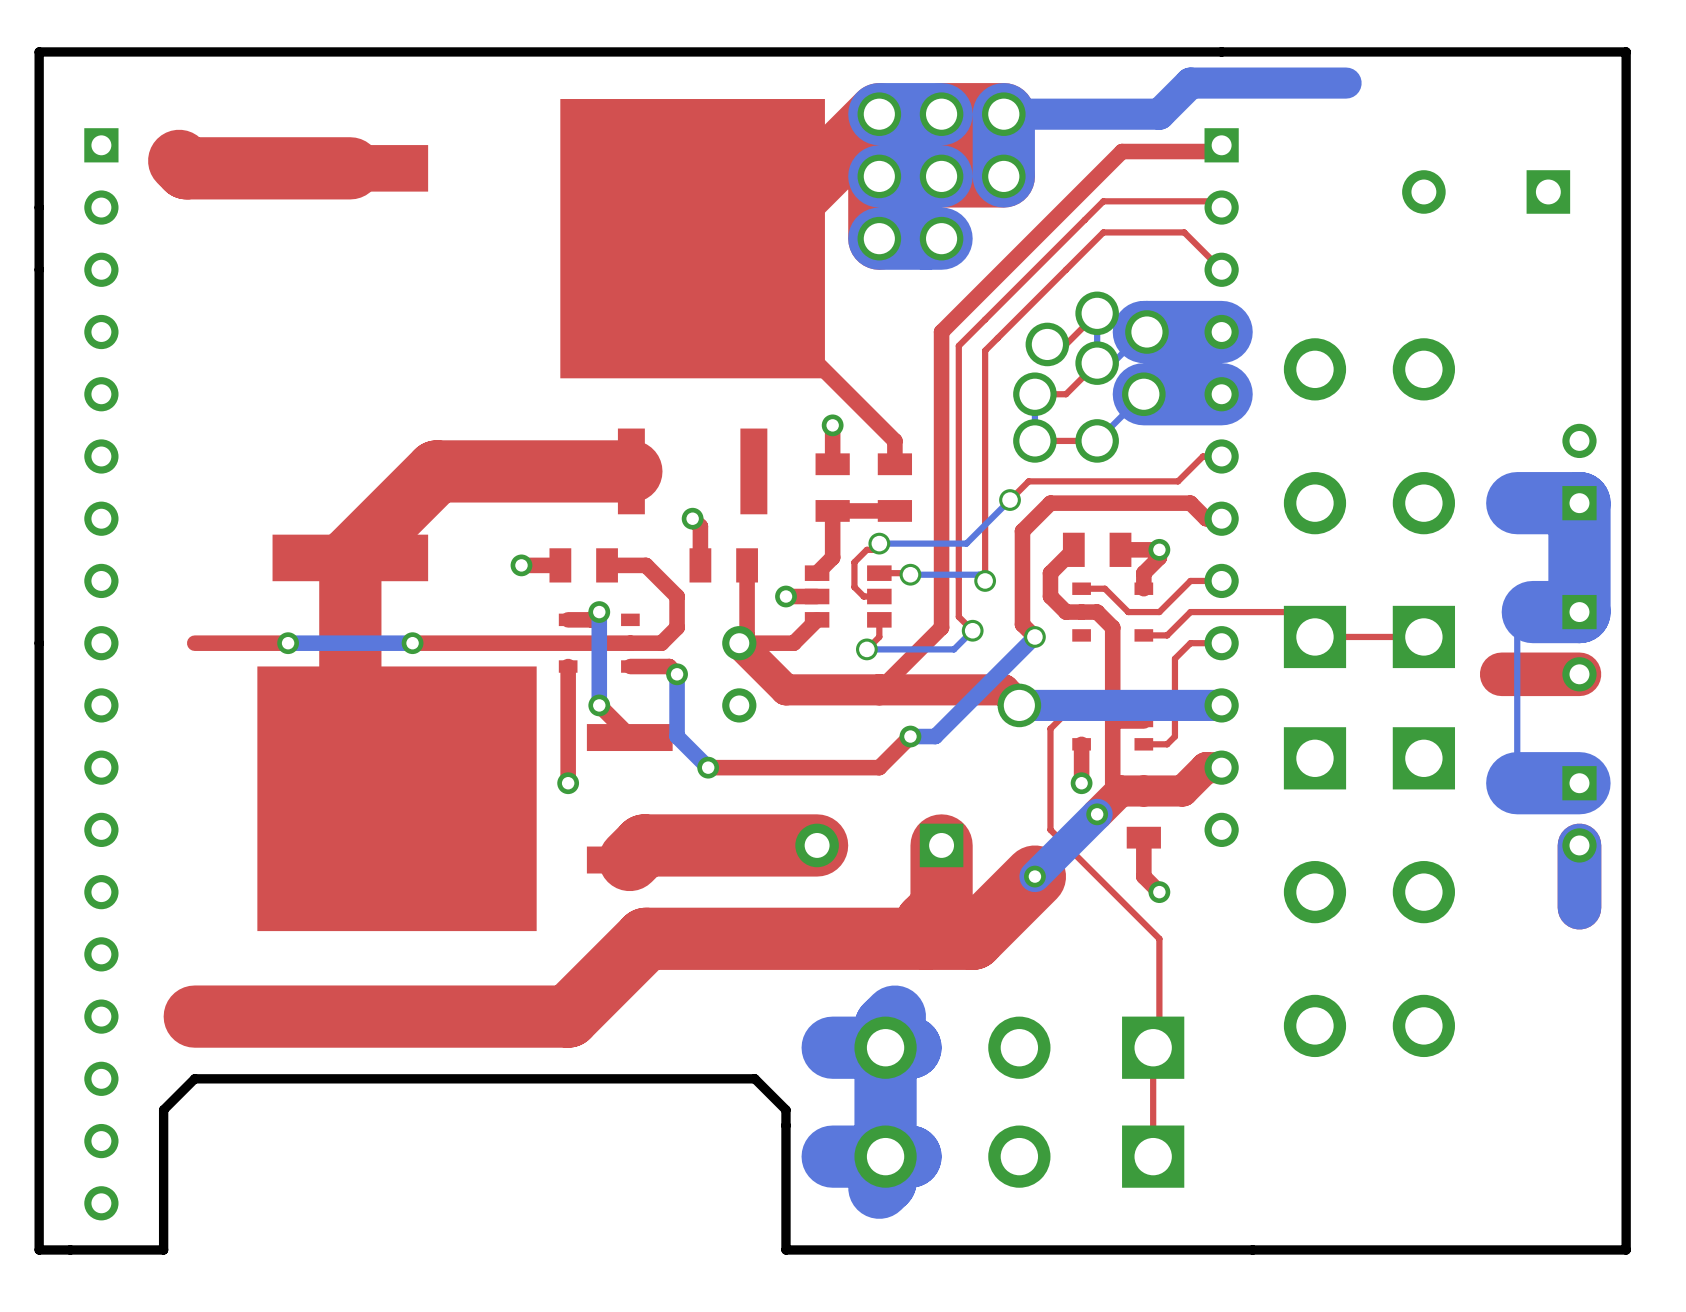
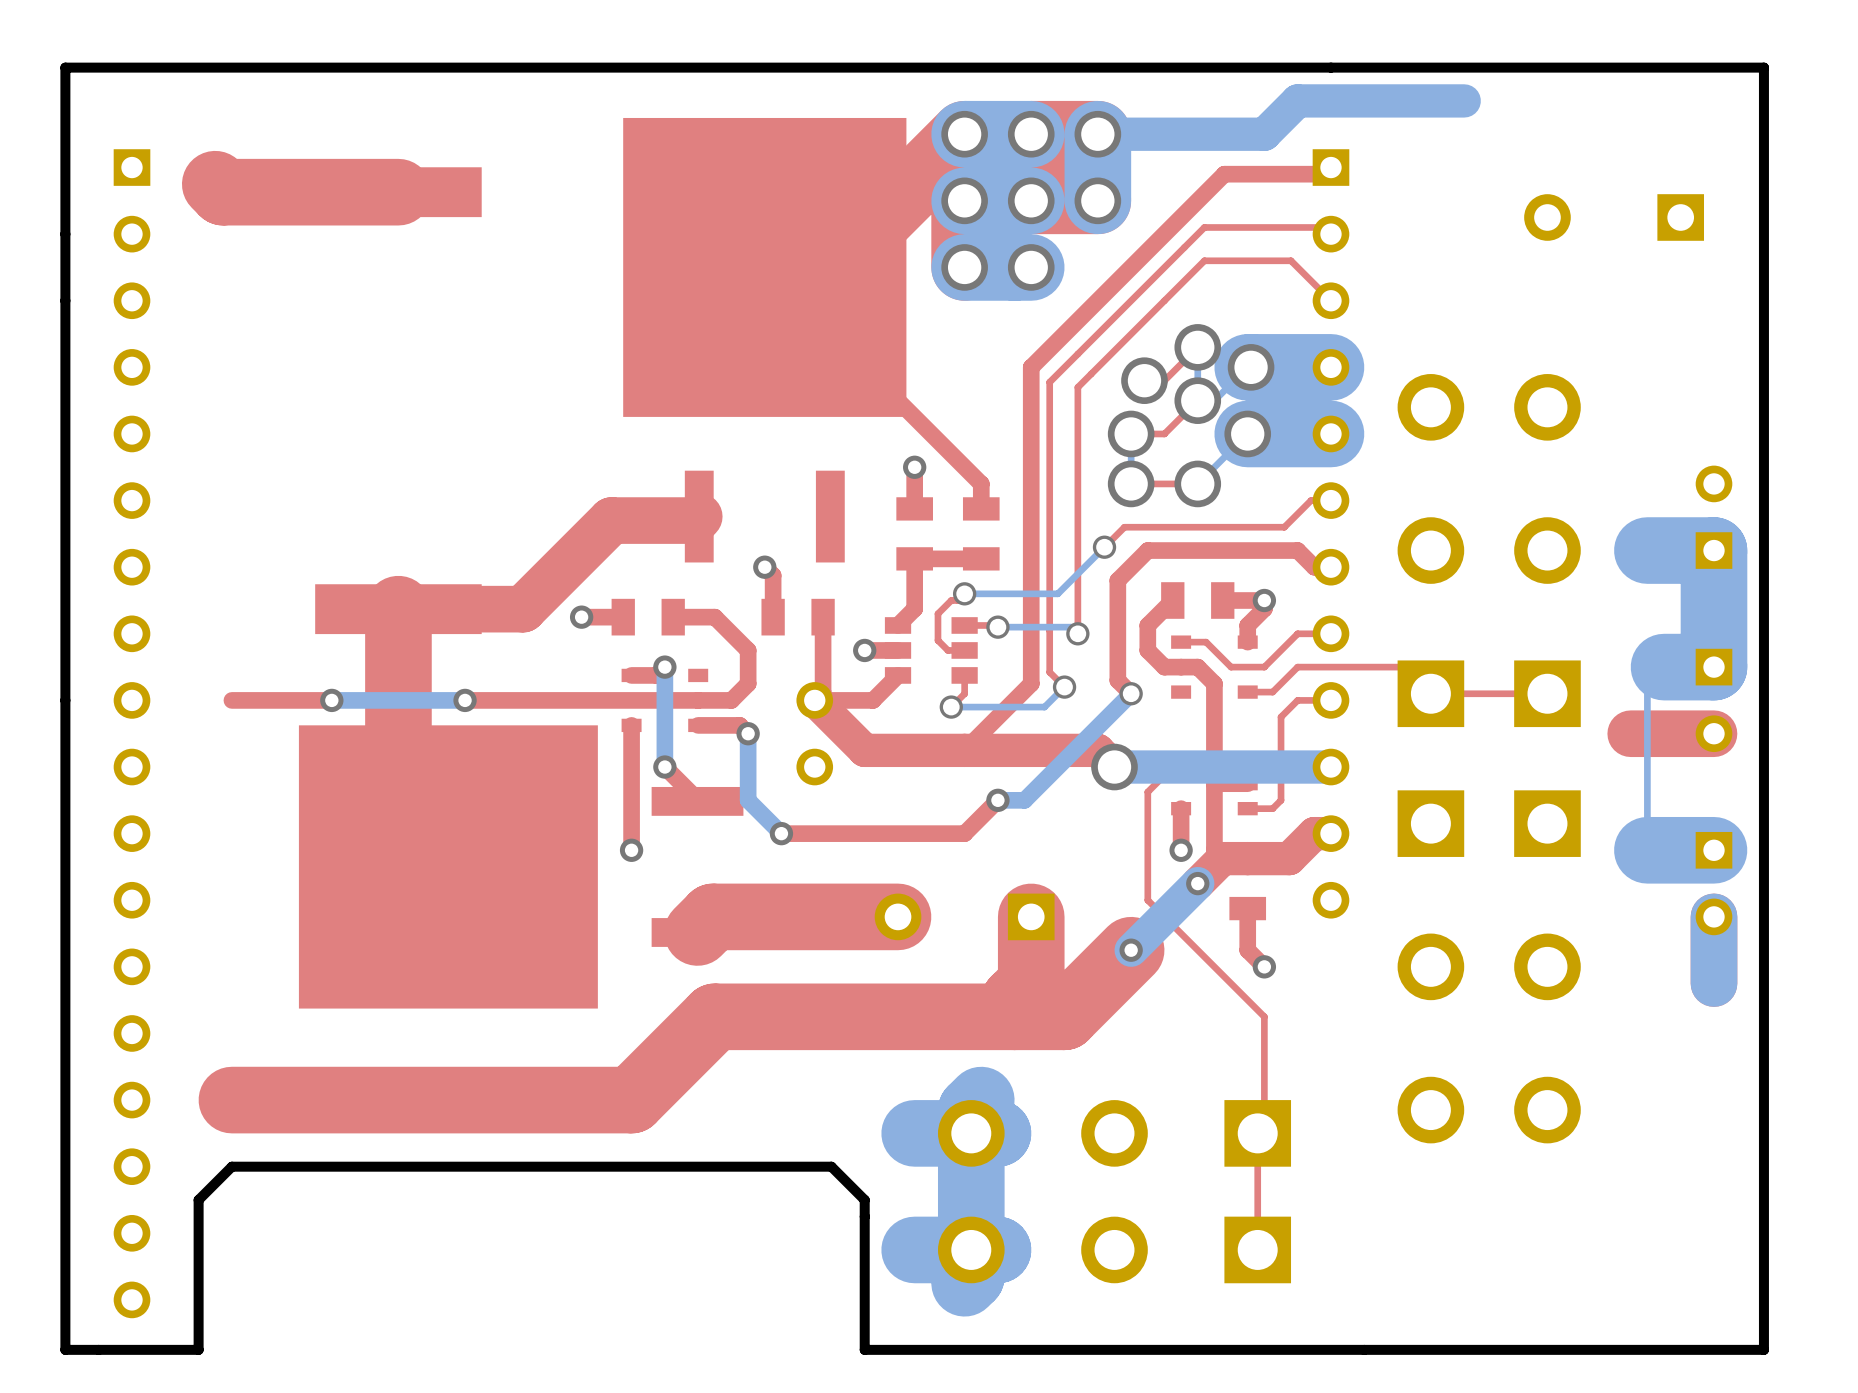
top track: (631, 471) (436, 471) (350, 557) -> (699, 516) (695, 520) (611, 520) (523, 609) (398, 609)

